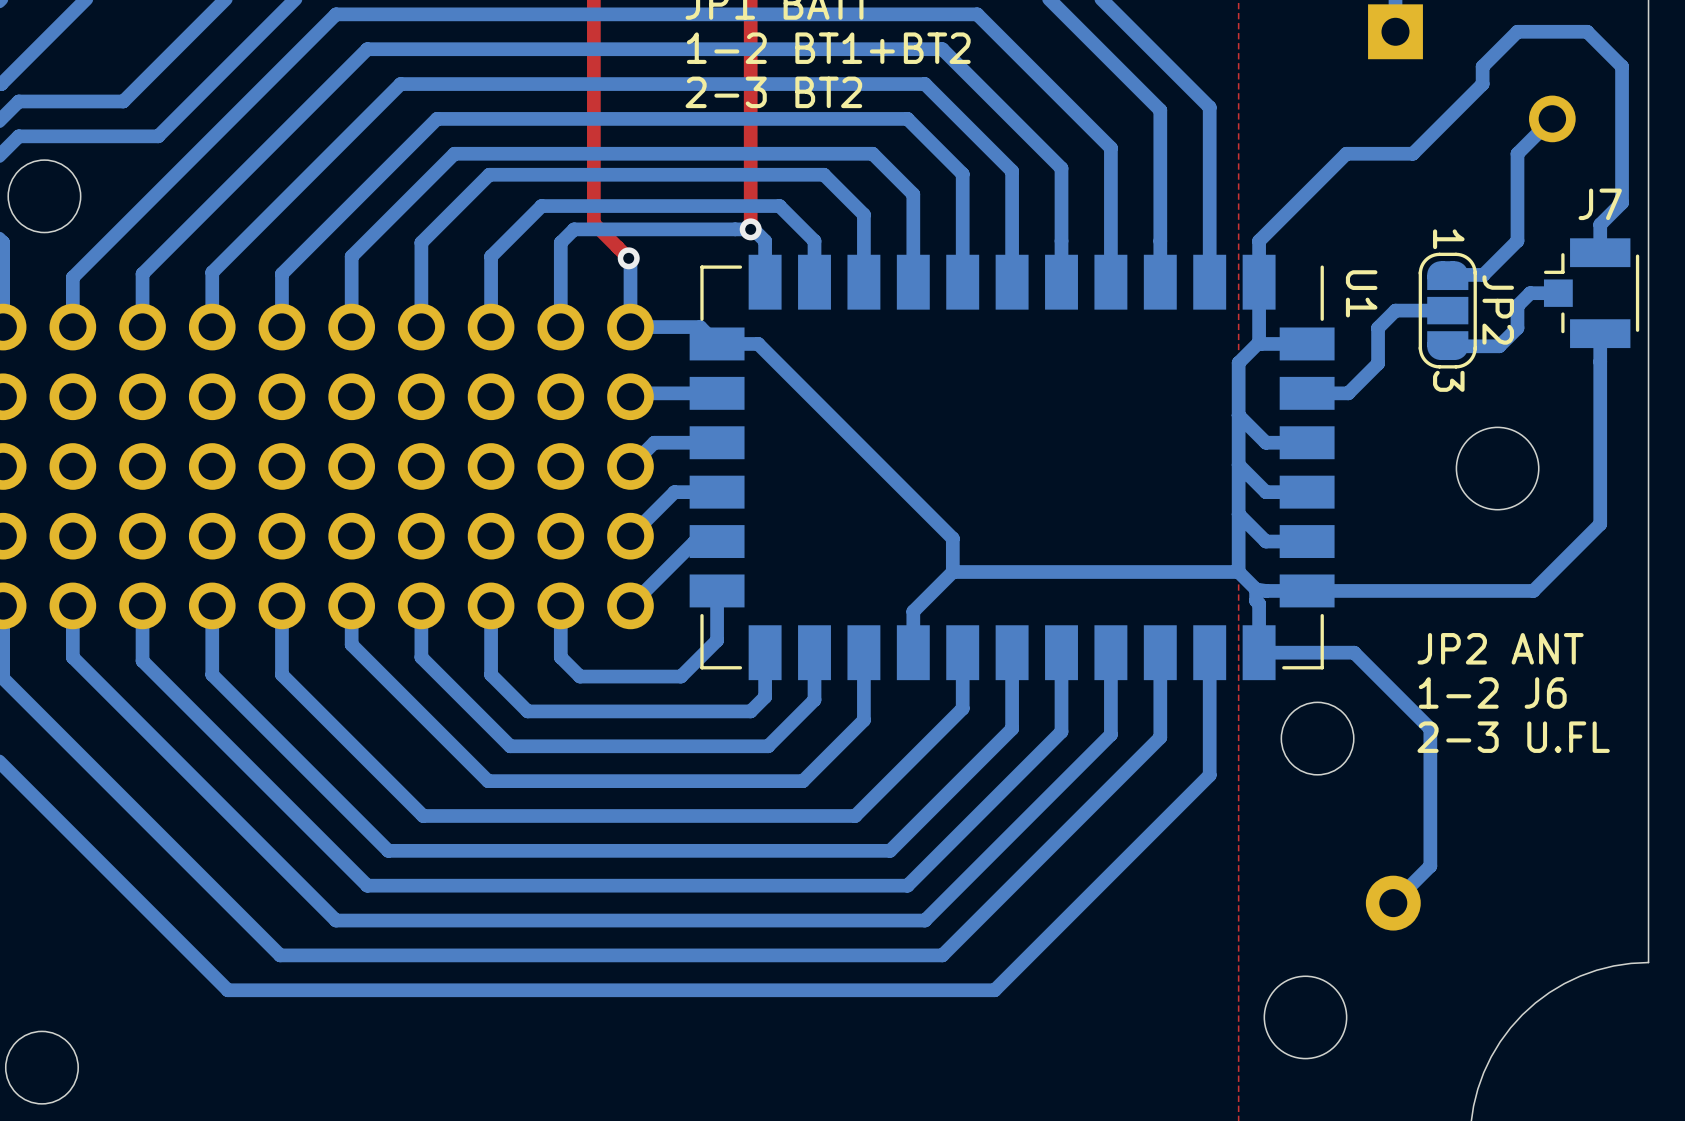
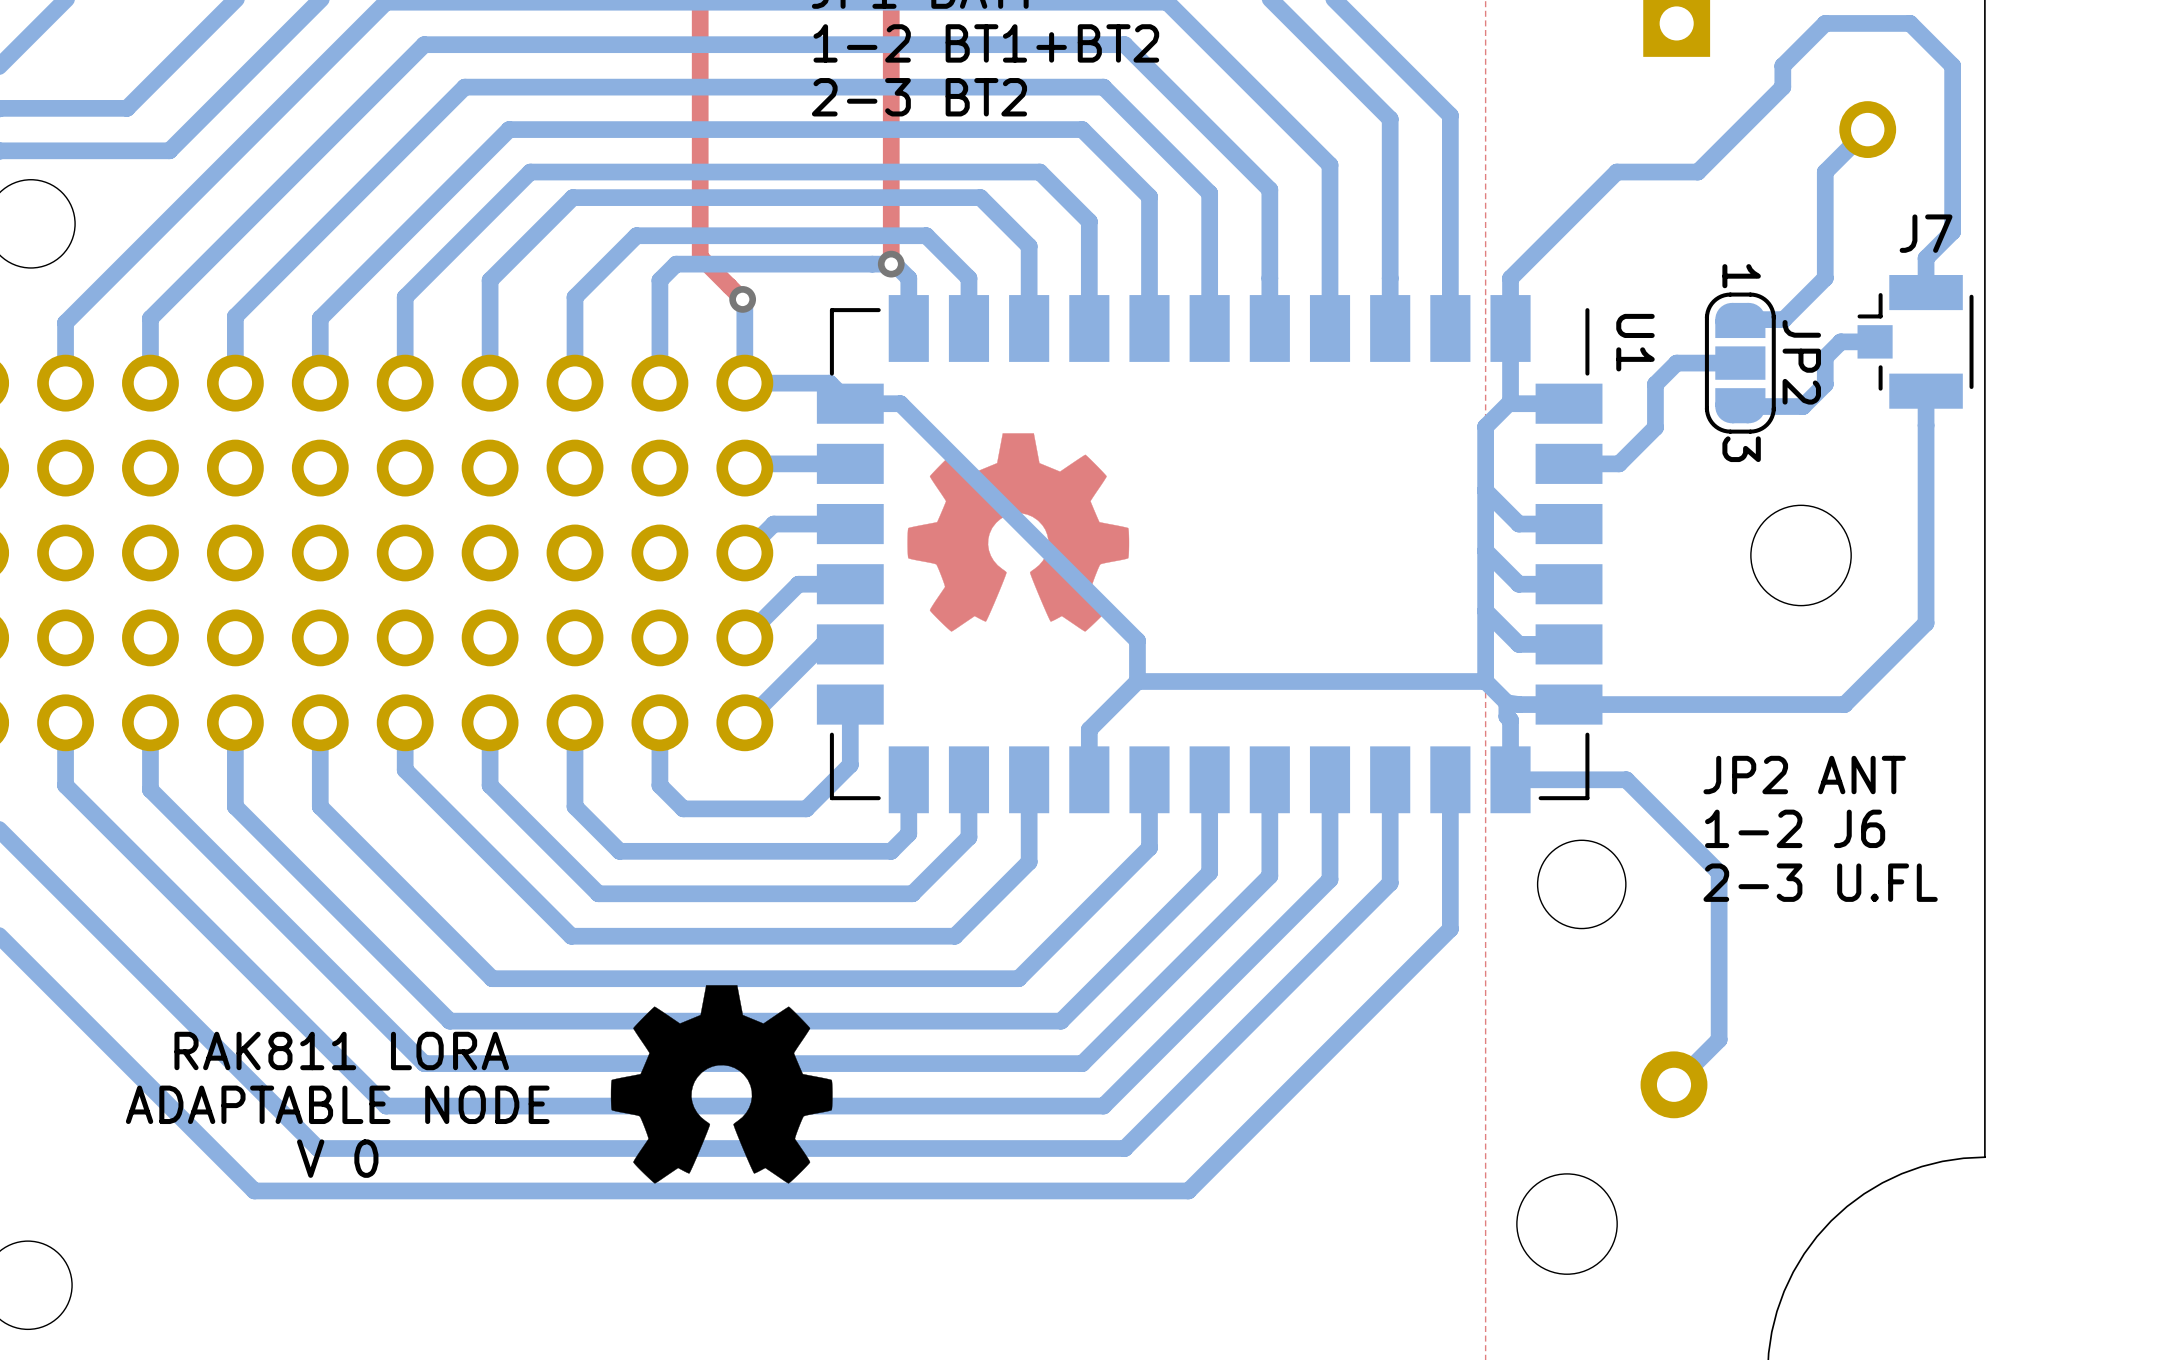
drawing: none -> [907, 433, 1130, 632]
drawing: none -> [610, 985, 833, 1184]
text: none -> RAK811 LORA (341, 1050)
text: none -> ADAPTABLE NODE (337, 1104)
text: none -> V 0 (337, 1158)

